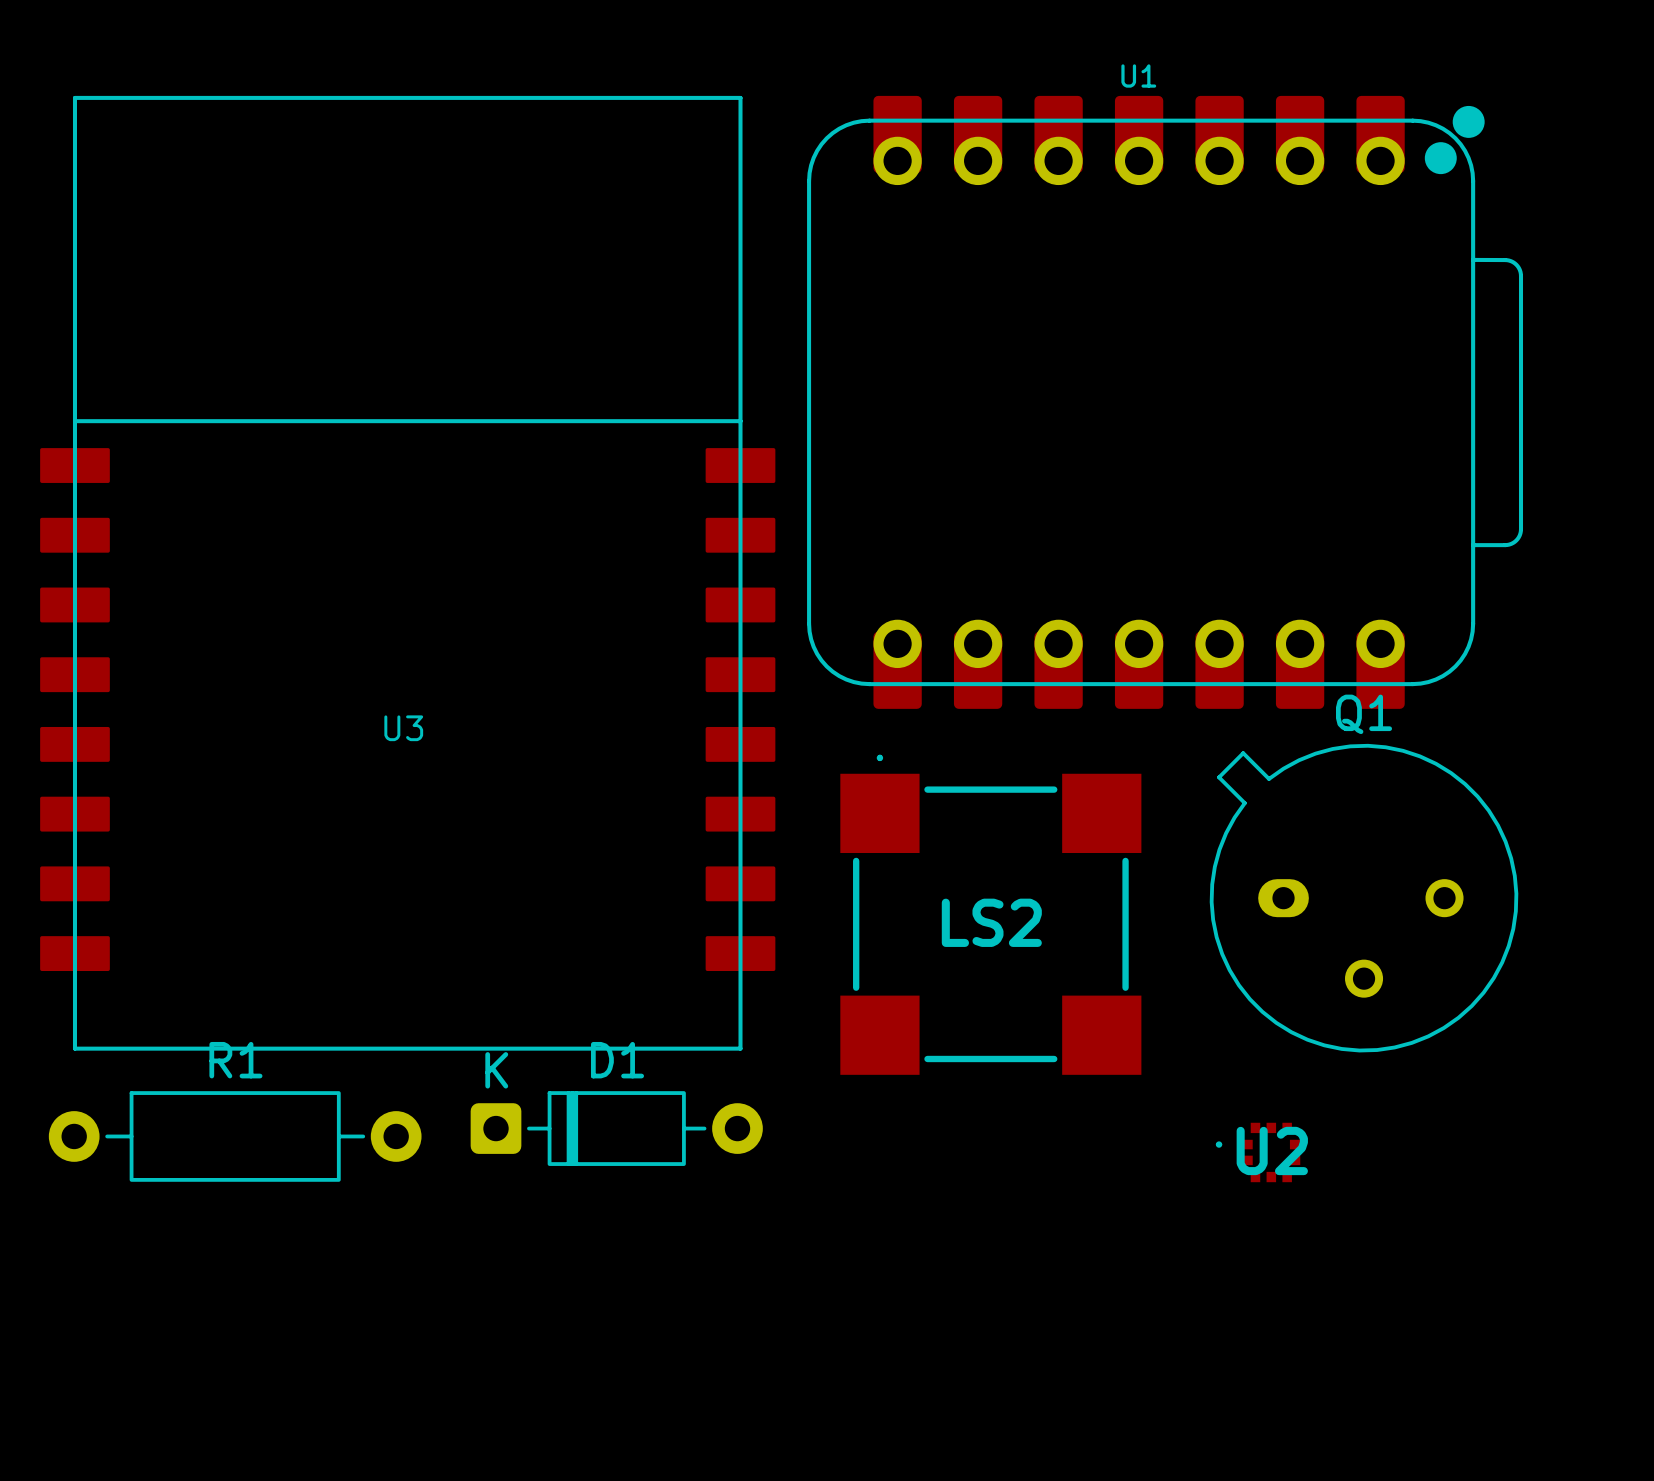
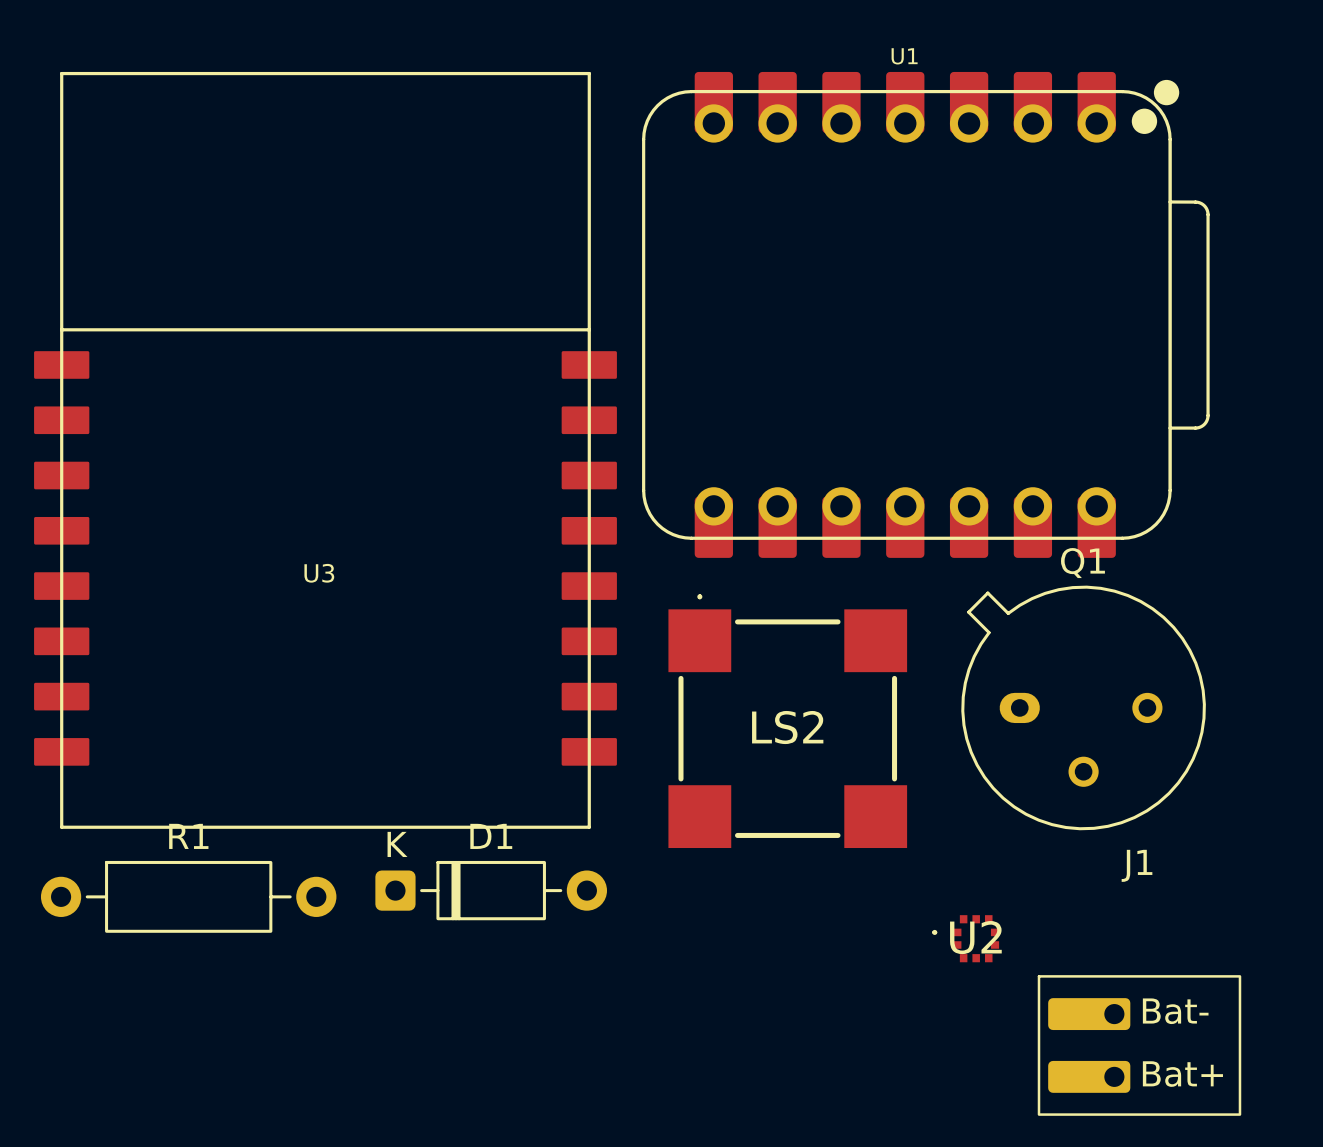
U2 position: (1258, 1152) -> (965, 938)
J1: none -> (1139, 1045)

